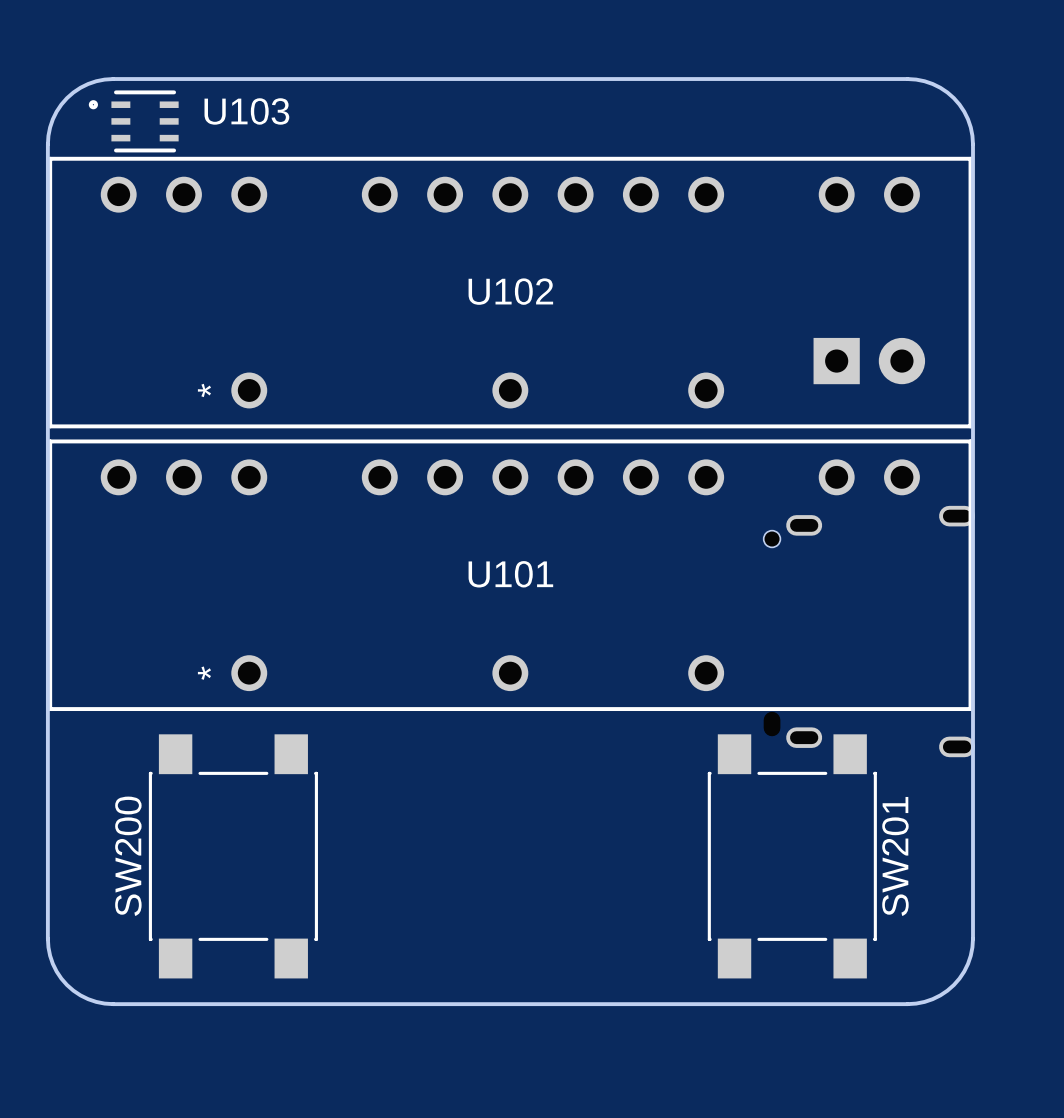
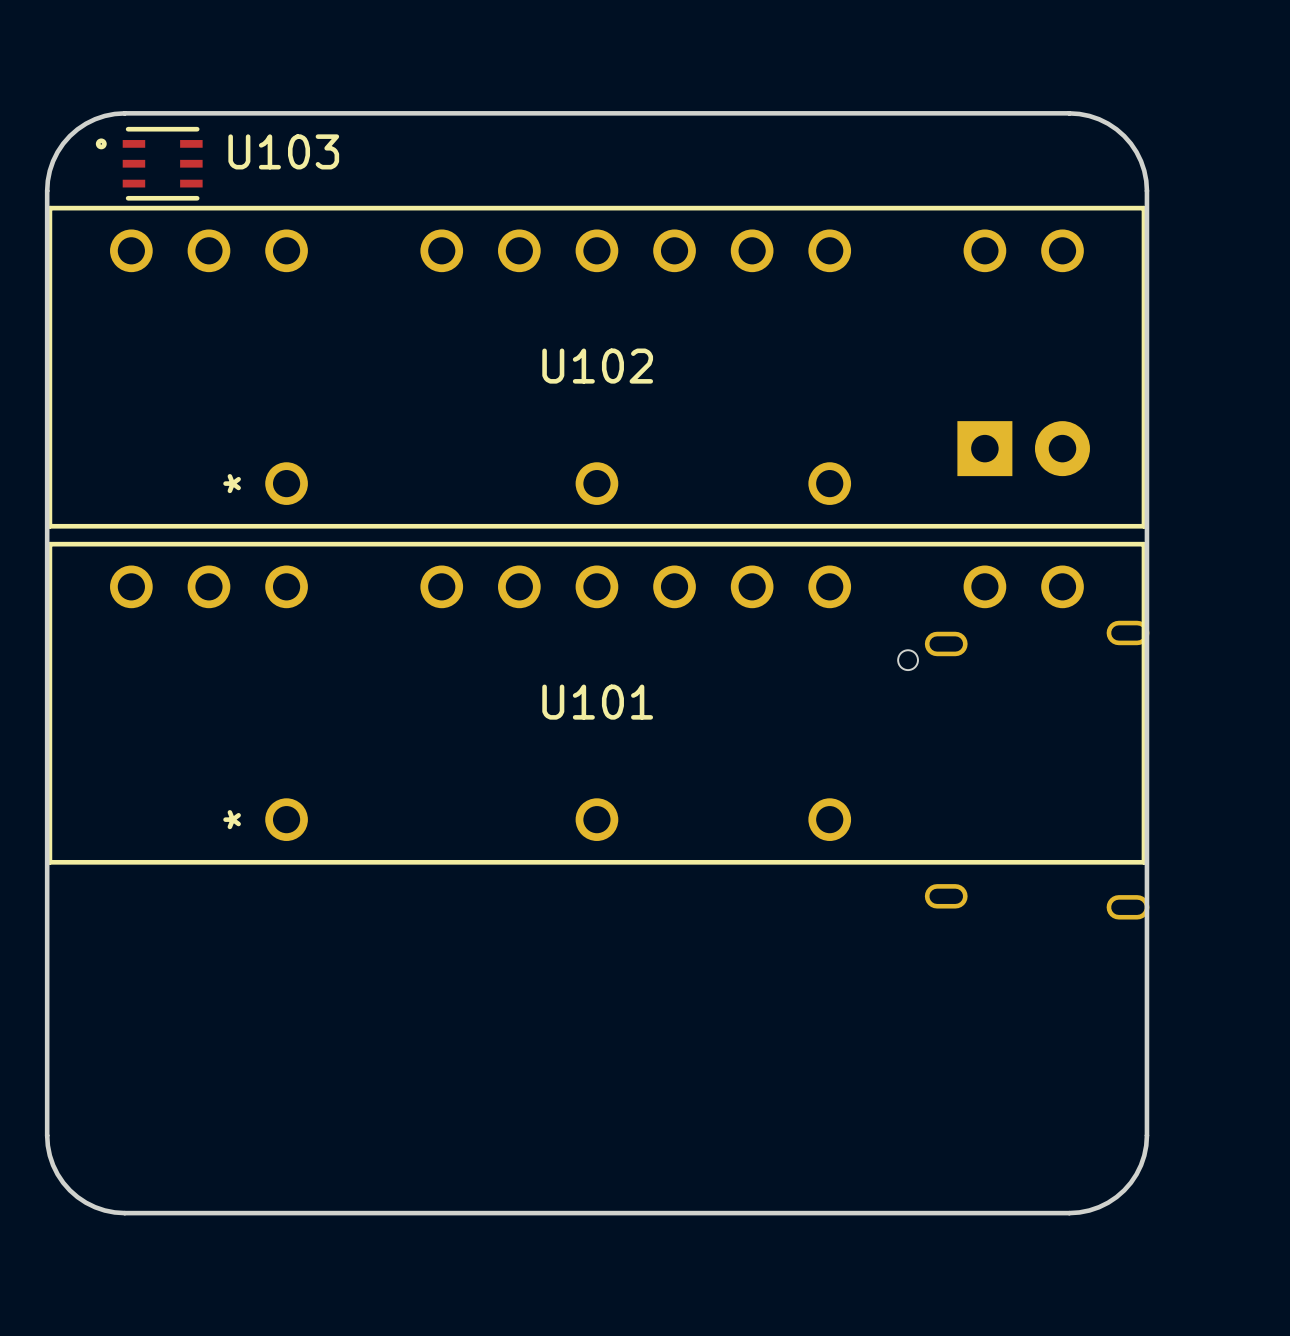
SW200: (233, 856) -> none
SW201: (792, 856) -> none

